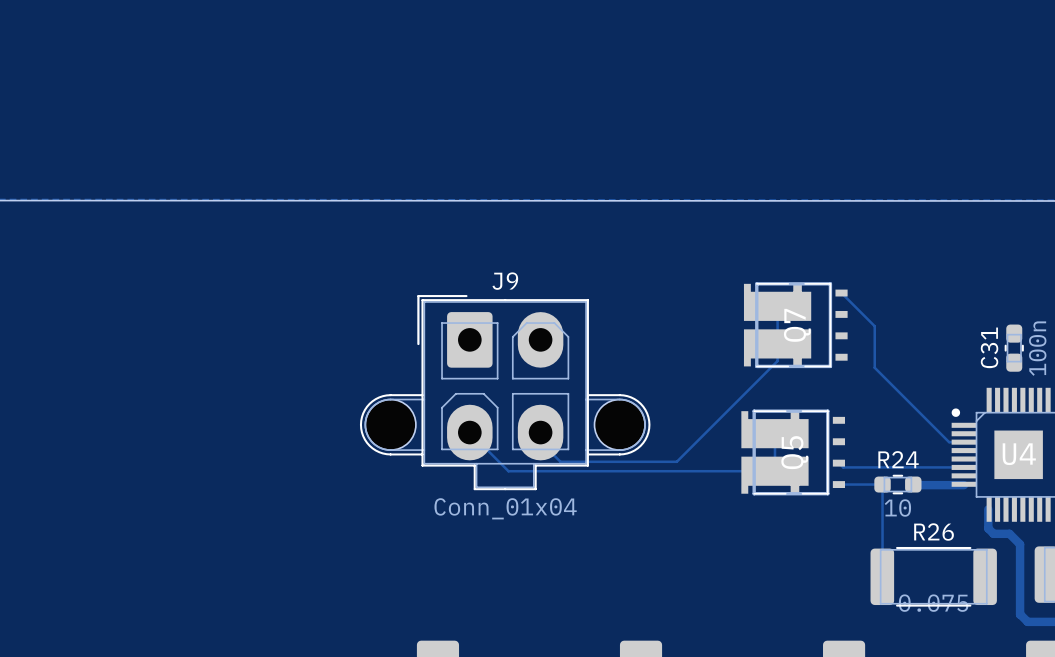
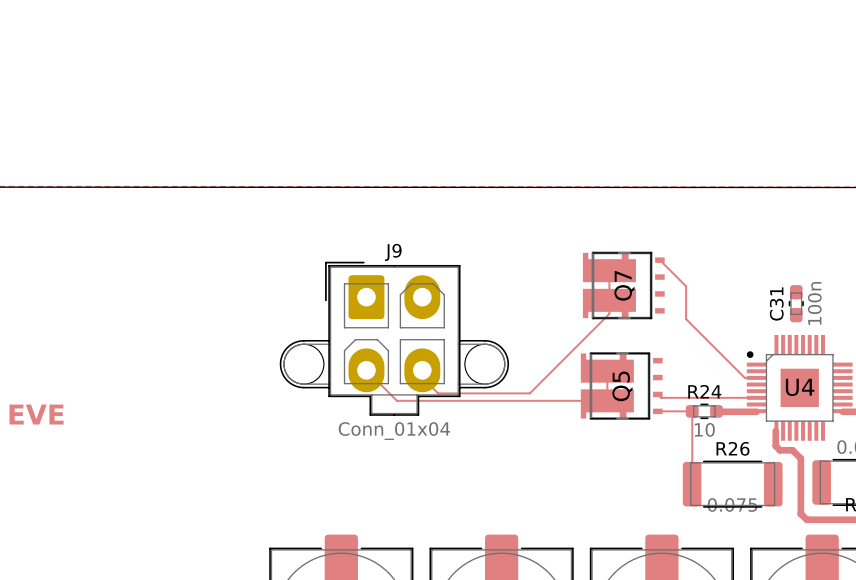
text: none -> EVE (36, 414)

